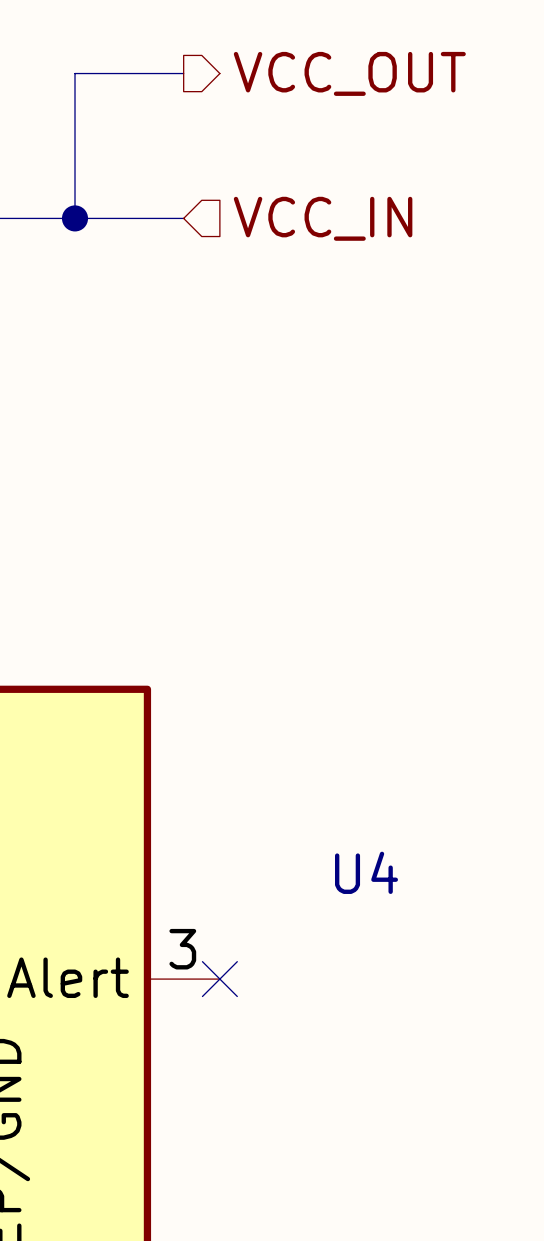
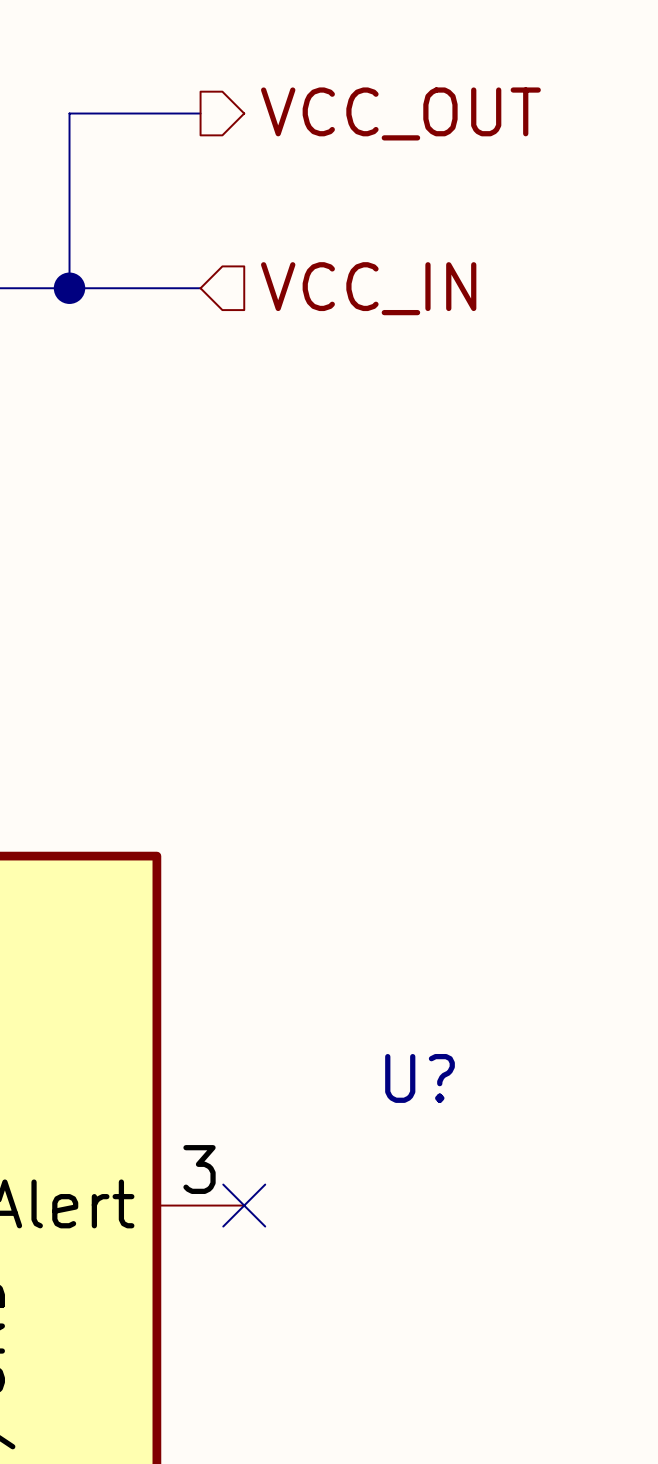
U4 name: U4 (366, 872) -> U? (420, 1078)

